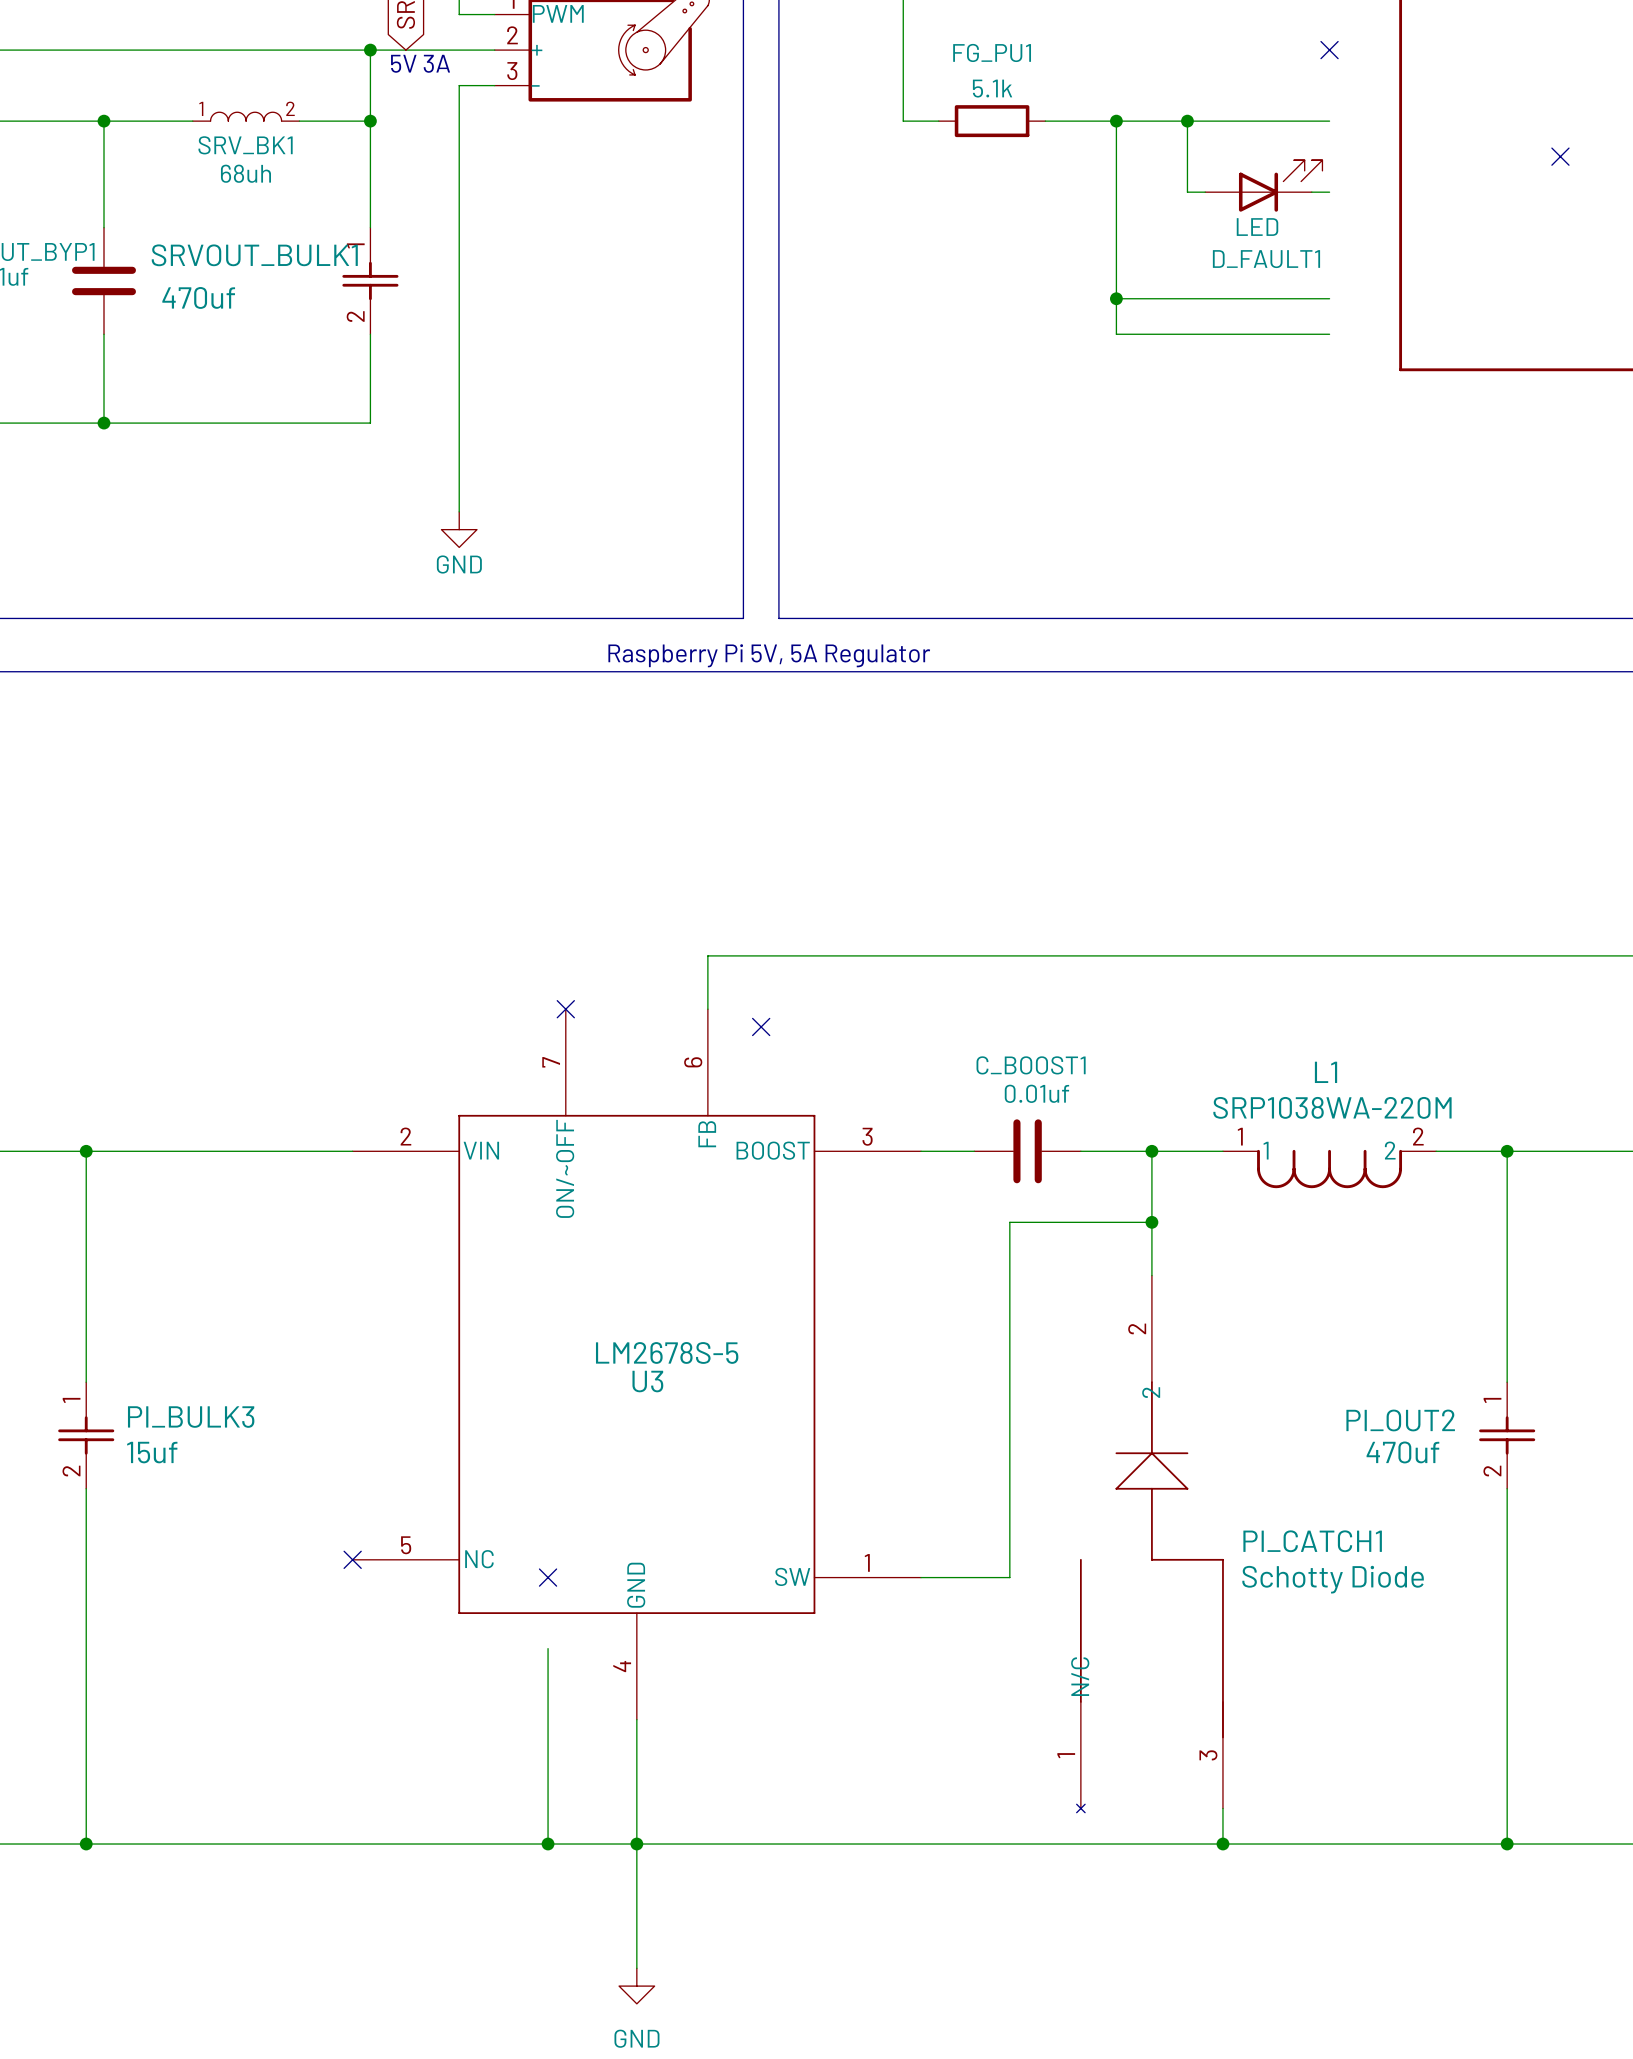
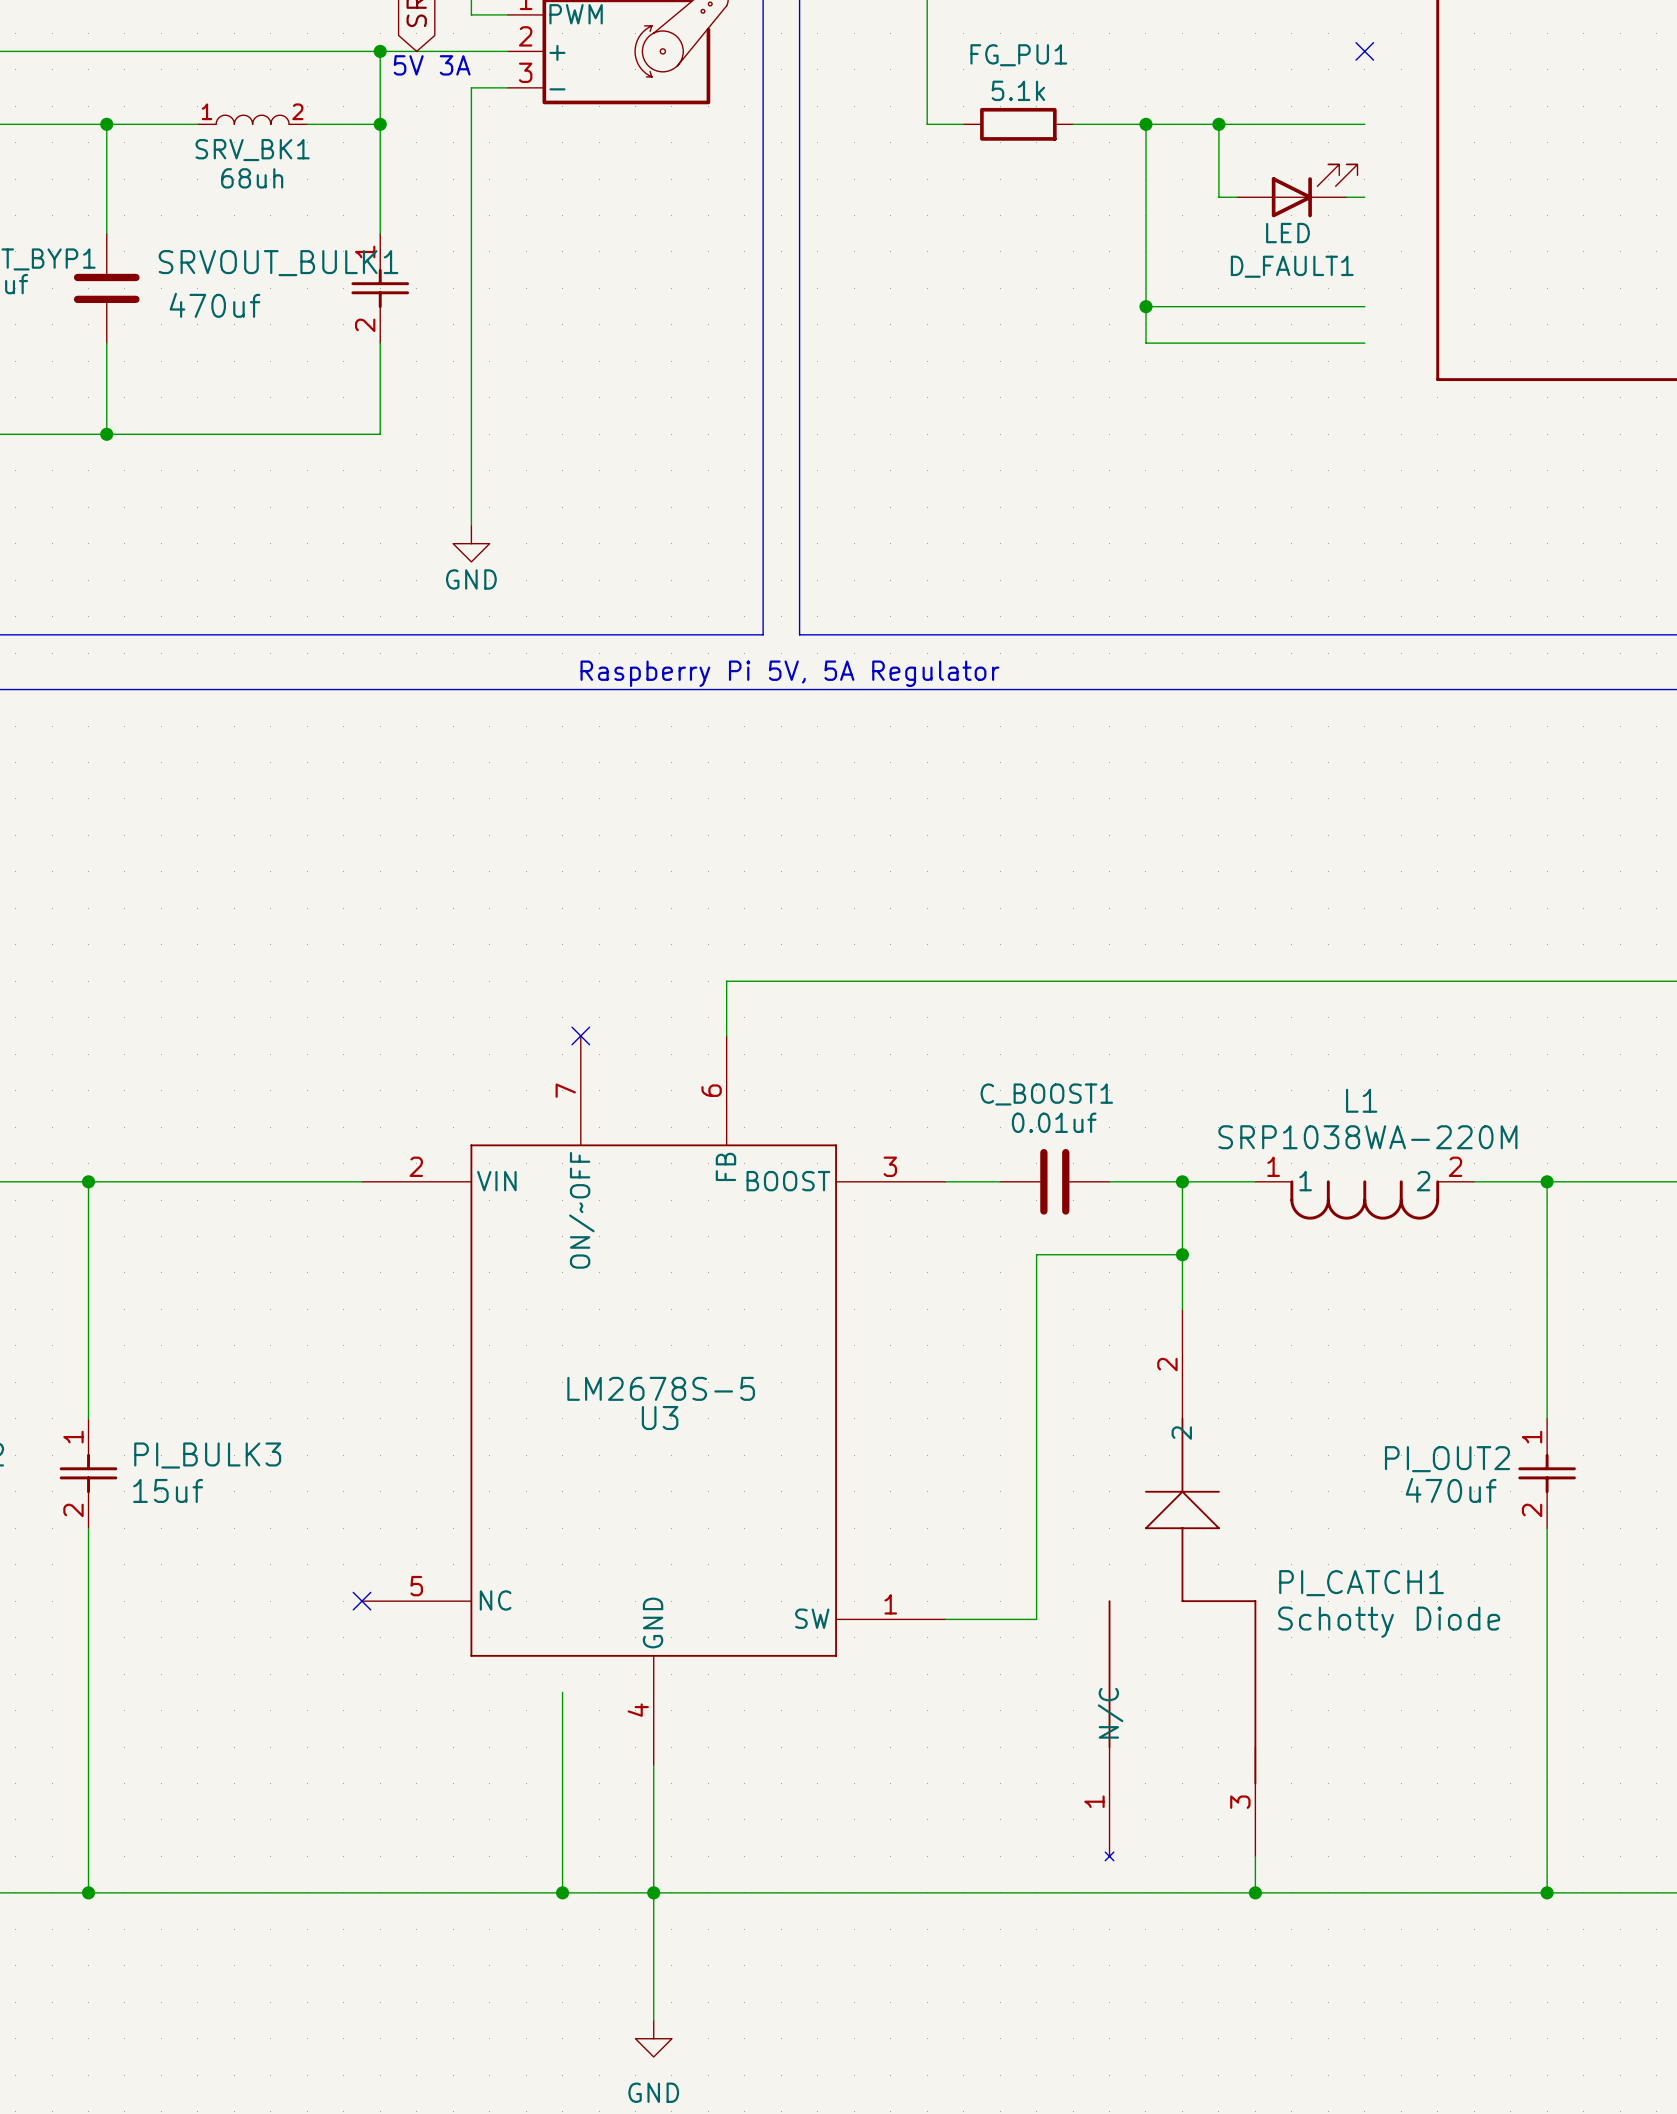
no-connect mark: (1560, 156) -> none
no-connect mark: (761, 1026) -> none
no-connect mark: (548, 1577) -> none

